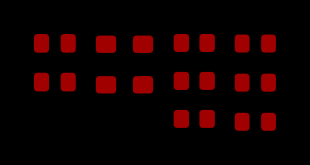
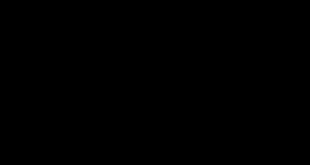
part: (194, 42) -> none
part: (54, 43) -> none
part: (255, 43) -> none
part: (124, 44) -> none
part: (194, 80) -> none
part: (54, 82) -> none
part: (255, 82) -> none
part: (124, 84) -> none
part: (194, 118) -> none
part: (255, 121) -> none

